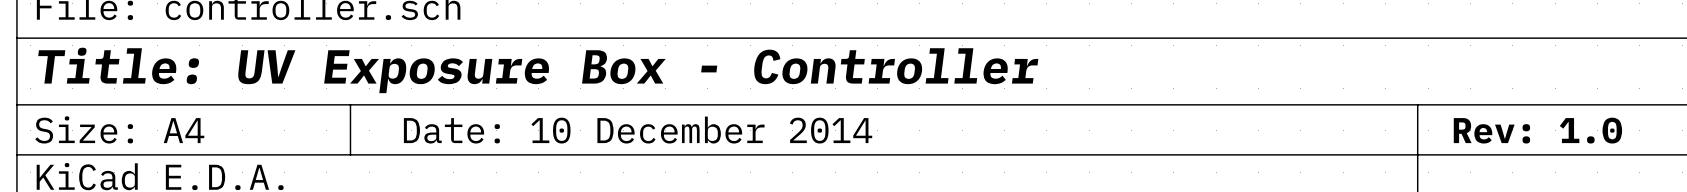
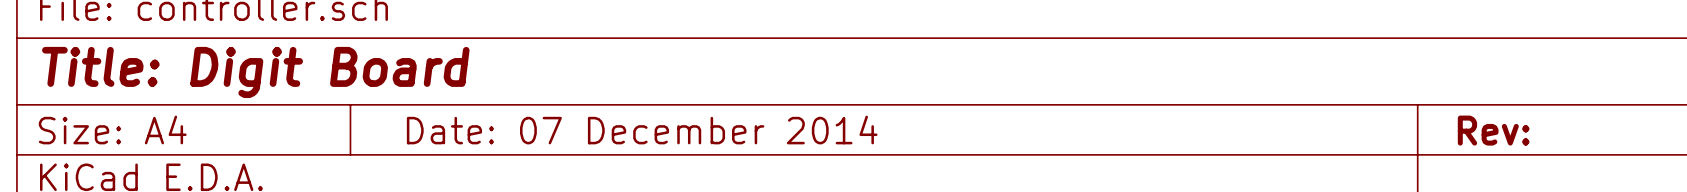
title block: Title: UV Exposure Box - Controller (538, 70) -> Title: Digit Board (255, 72)
title block: Date: 10 December 2014 (638, 130) -> Date: 07 December 2014 (642, 129)
title block: Rev: 1.0 (1537, 130) -> Rev: (1493, 130)

